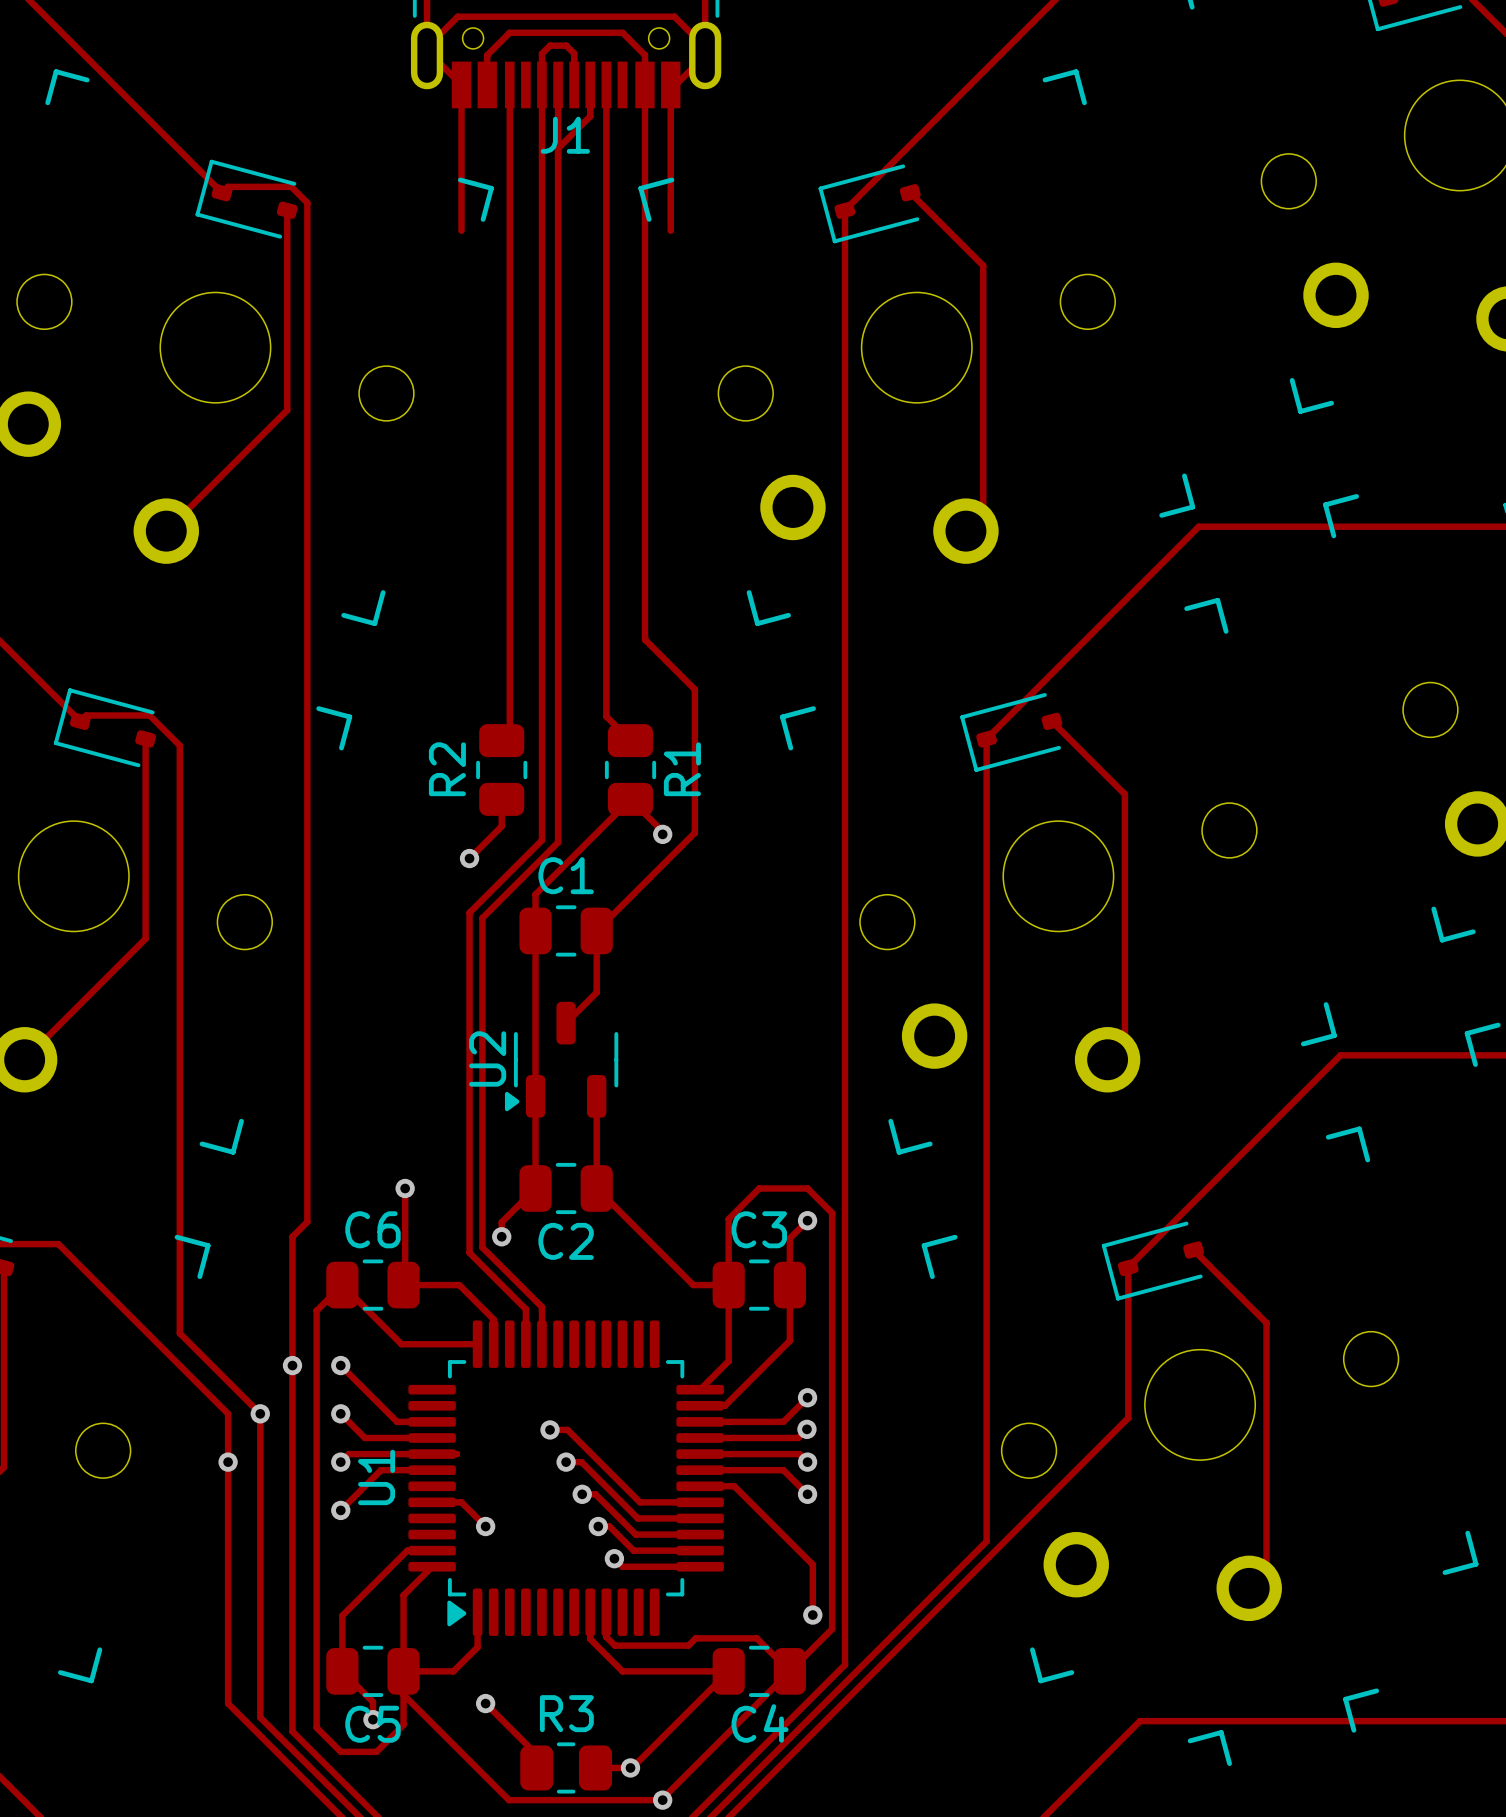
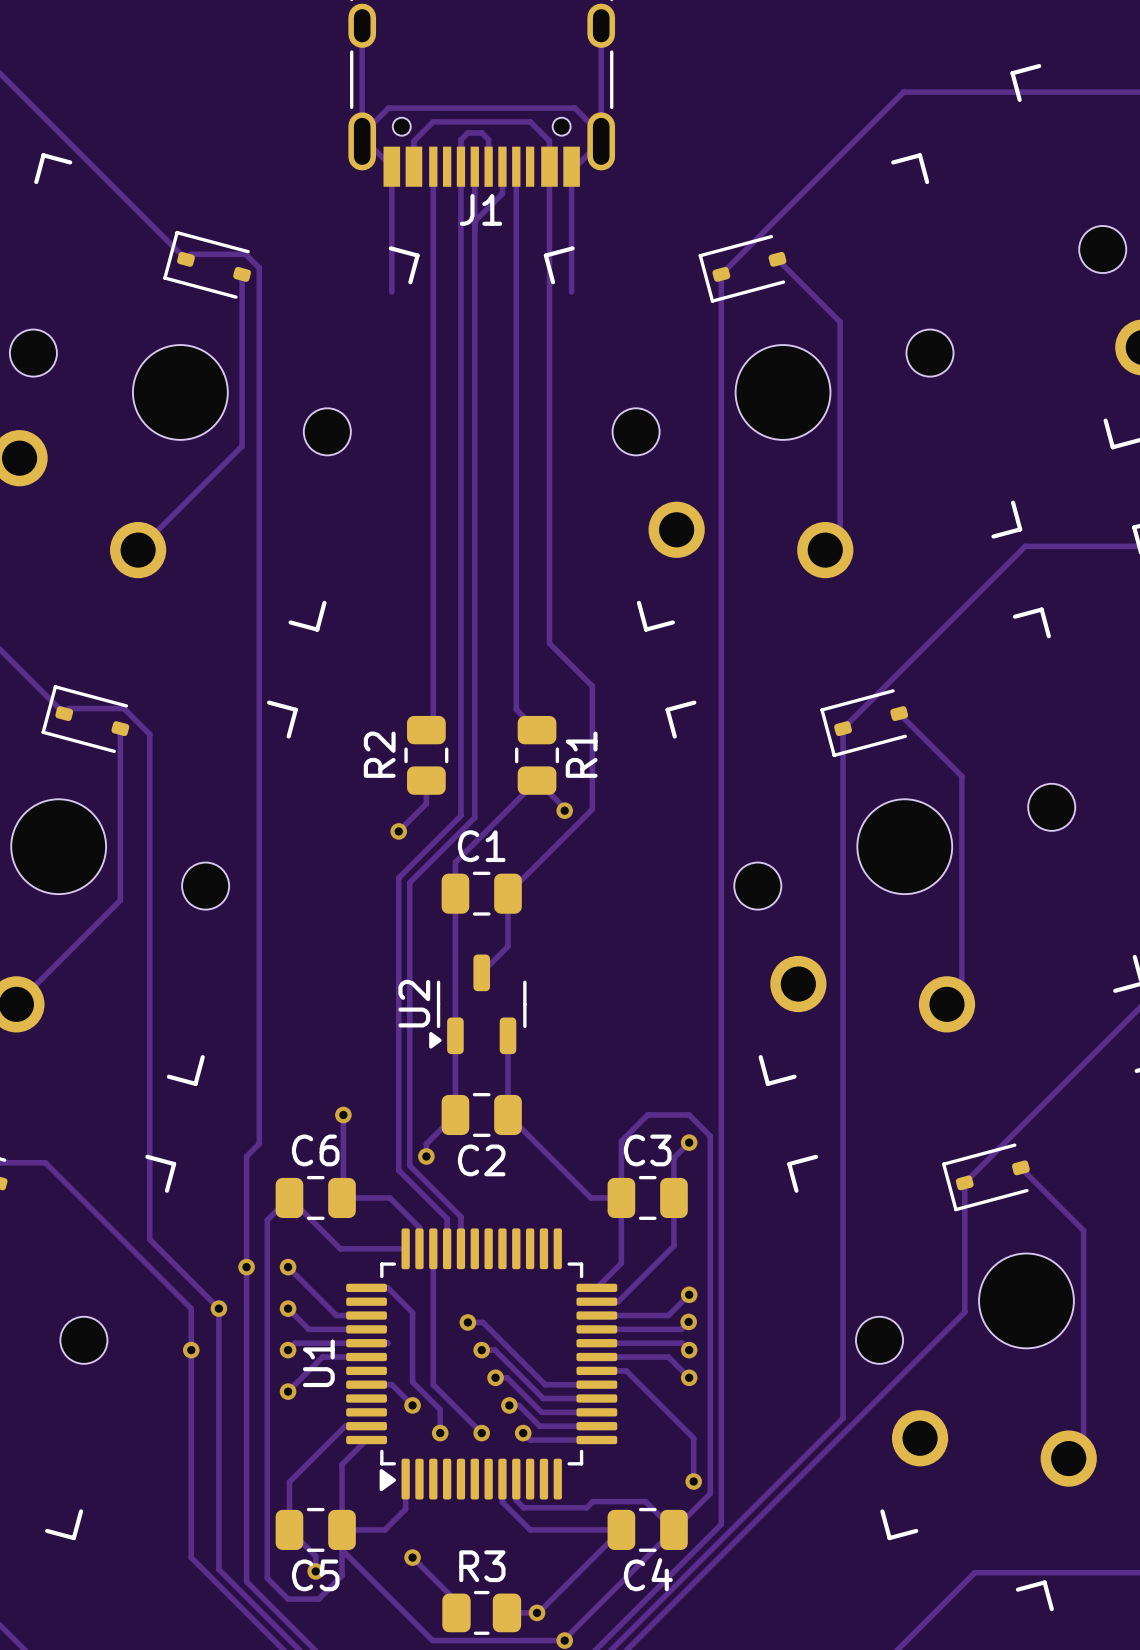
track: none -> (433, 1248) (433, 1384) (481, 1433)
track: none -> (366, 1287) (387, 1287) (412, 1312) (412, 1381) (440, 1409) (440, 1433)
via: none -> (440, 1433)
via: none -> (481, 1433)

